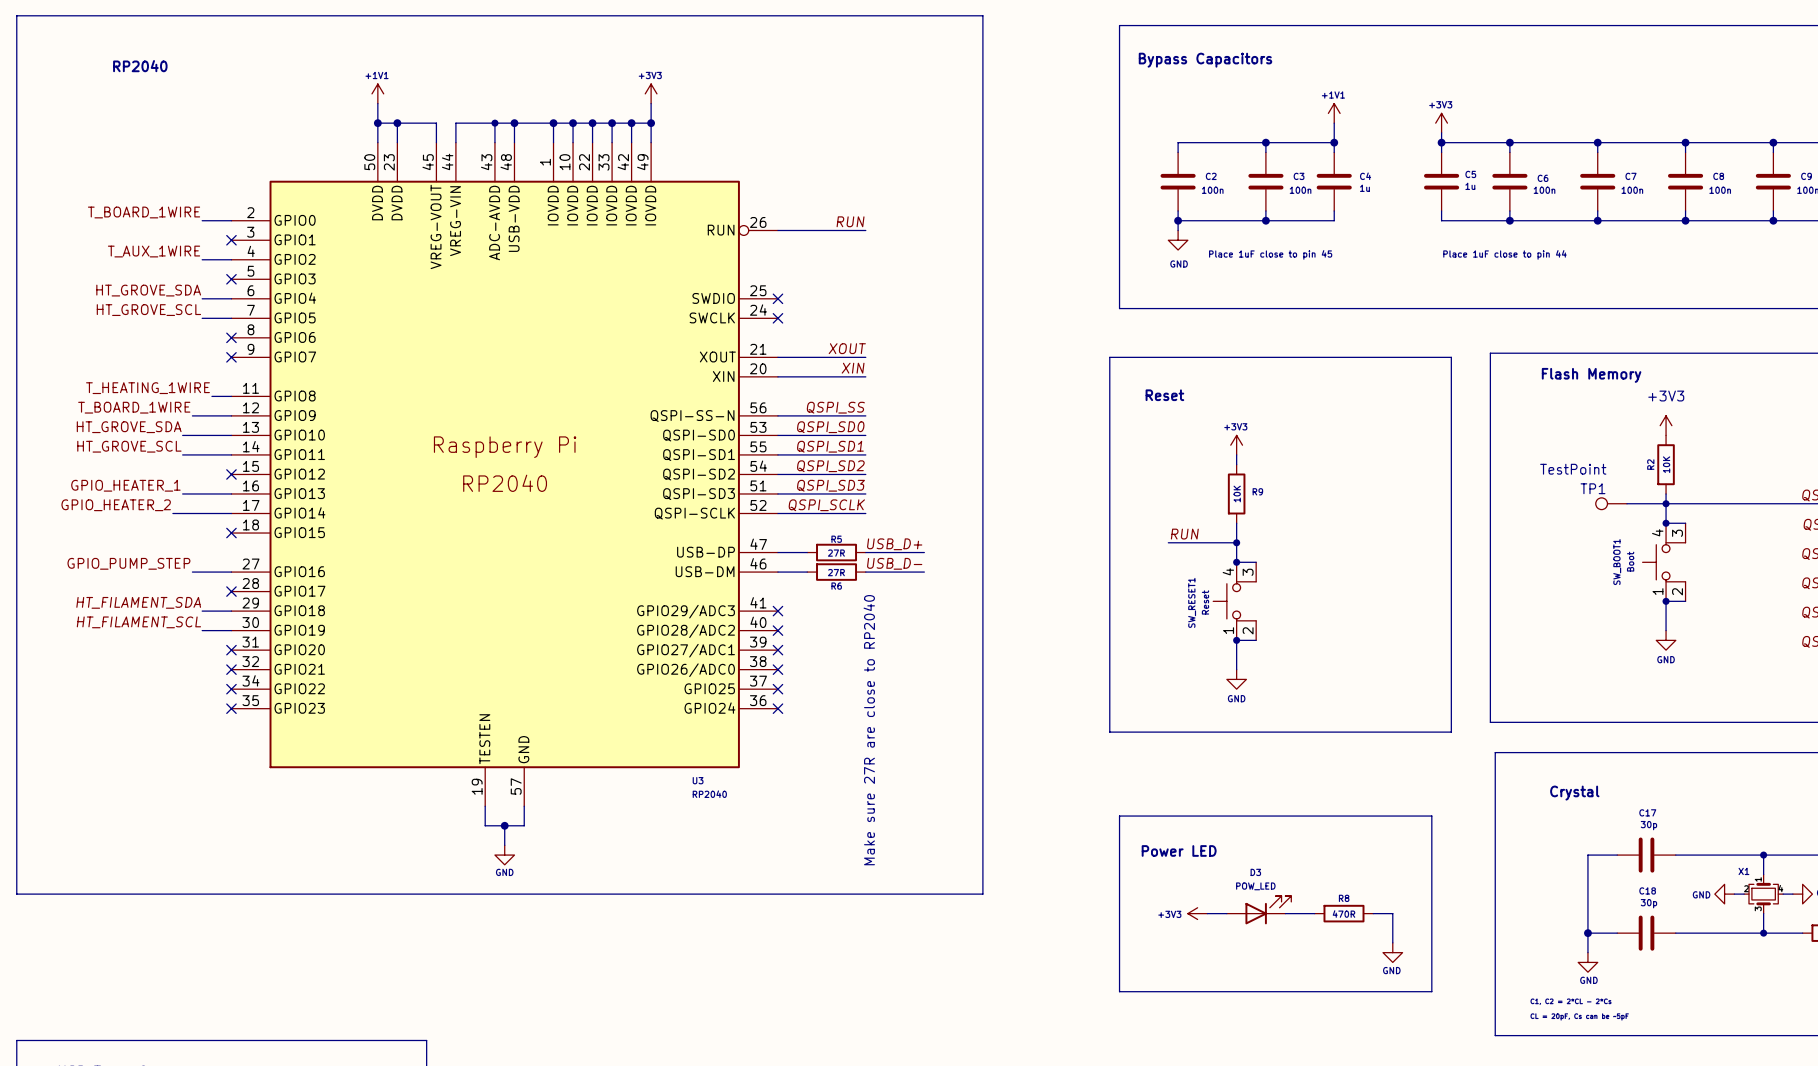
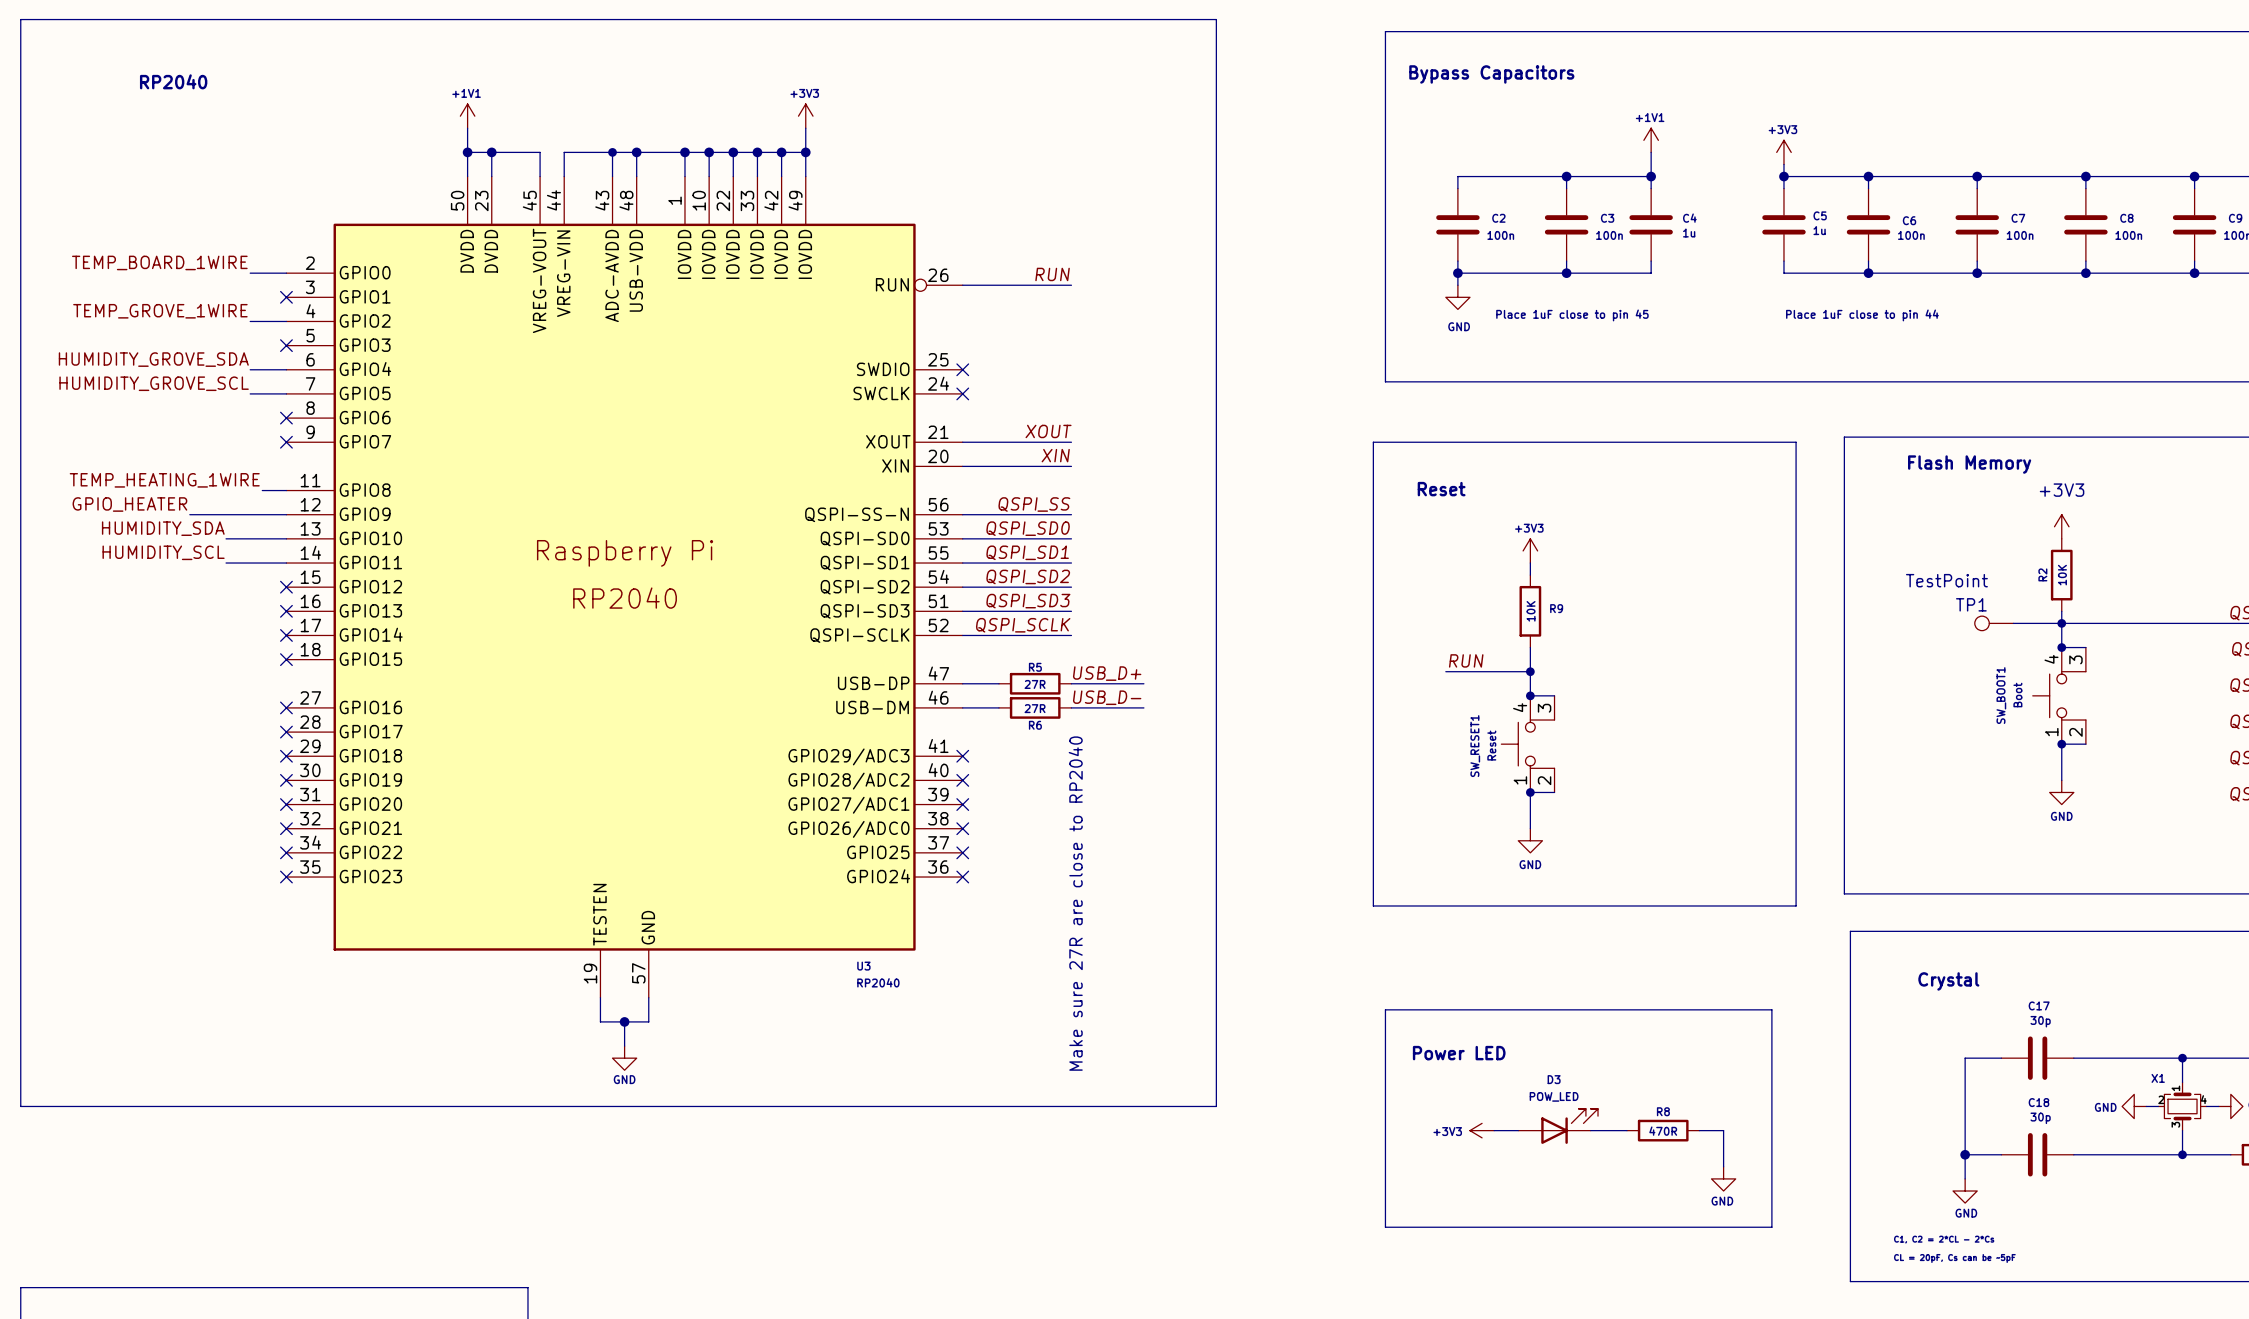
label: T_BOARD_1WIRE (144, 212) -> TEMP_BOARD_1WIRE (159, 262)
label: T_AUX_1WIRE (154, 251) -> TEMP_GROVE_1WIRE (160, 311)
label: HT_GROVE_SDA (148, 290) -> HUMIDITY_GROVE_SDA (153, 359)
label: HT_GROVE_SCL (148, 310) -> HUMIDITY_GROVE_SCL (154, 383)
label: T_HEATING_1WIRE (147, 388) -> TEMP_HEATING_1WIRE (164, 480)
label: none -> GPIO_HEATER (129, 504)
label: T_BOARD_1WIRE (134, 407) -> none
label: HT_GROVE_SDA (129, 427) -> HUMIDITY_SDA (163, 528)
label: HT_GROVE_SCL (129, 446) -> HUMIDITY_SCL (163, 552)
label: GPIO_HEATER_1 (125, 485) -> none
wire: (182, 493) (231, 493) -> none
no-connect mark: none -> (286, 611)
label: GPIO_HEATER_2 (116, 505) -> none
wire: (172, 513) (231, 513) -> none
no-connect mark: none -> (286, 635)
label: GPIO_PUMP_STEP (128, 563) -> none
wire: (192, 572) (231, 572) -> (189, 514) (238, 514)
no-connect mark: none -> (286, 707)
label: HT_FILAMENT_SDA (138, 602) -> none
wire: (202, 611) (231, 611) -> none
no-connect mark: none -> (286, 756)
label: HT_FILAMENT_SCL (138, 622) -> none
wire: (202, 630) (231, 630) -> none
no-connect mark: none -> (286, 780)

